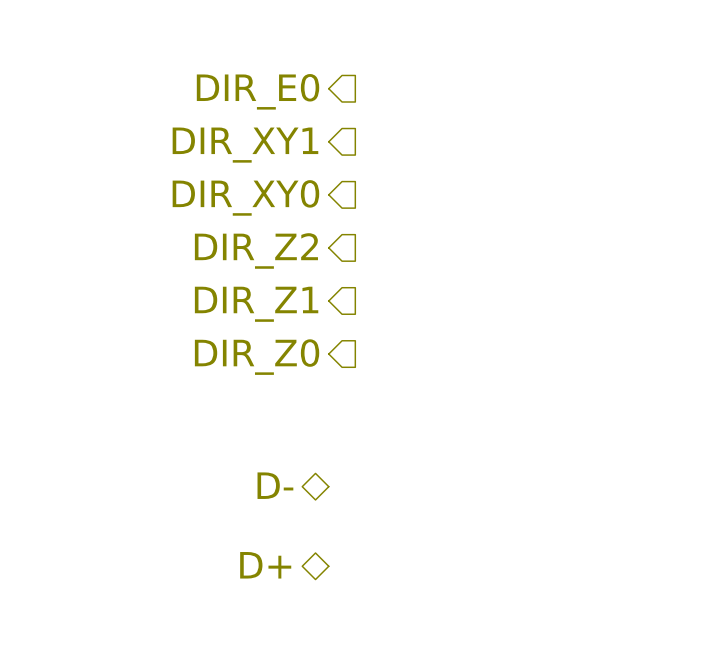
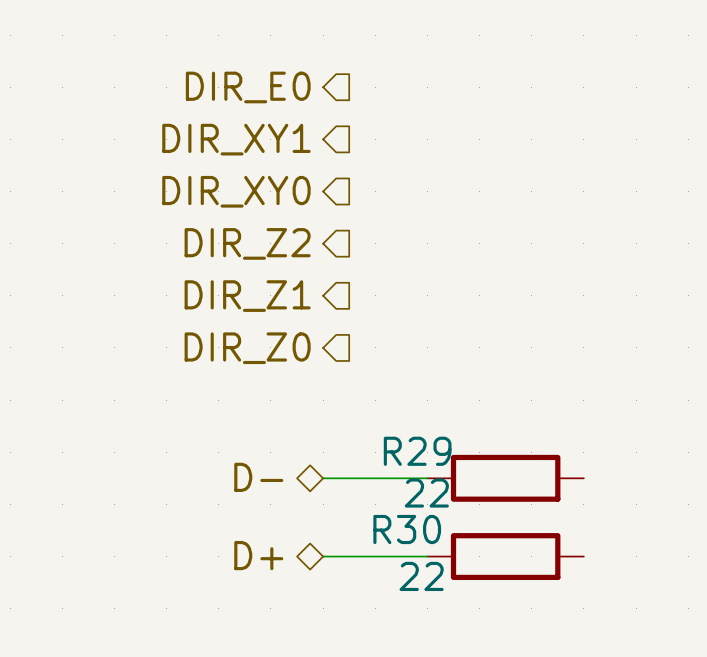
wire: none -> (323, 478) (427, 478)
R29: none -> 22 (505, 478)
wire: none -> (323, 556) (427, 556)
R30: none -> 22 (505, 556)

